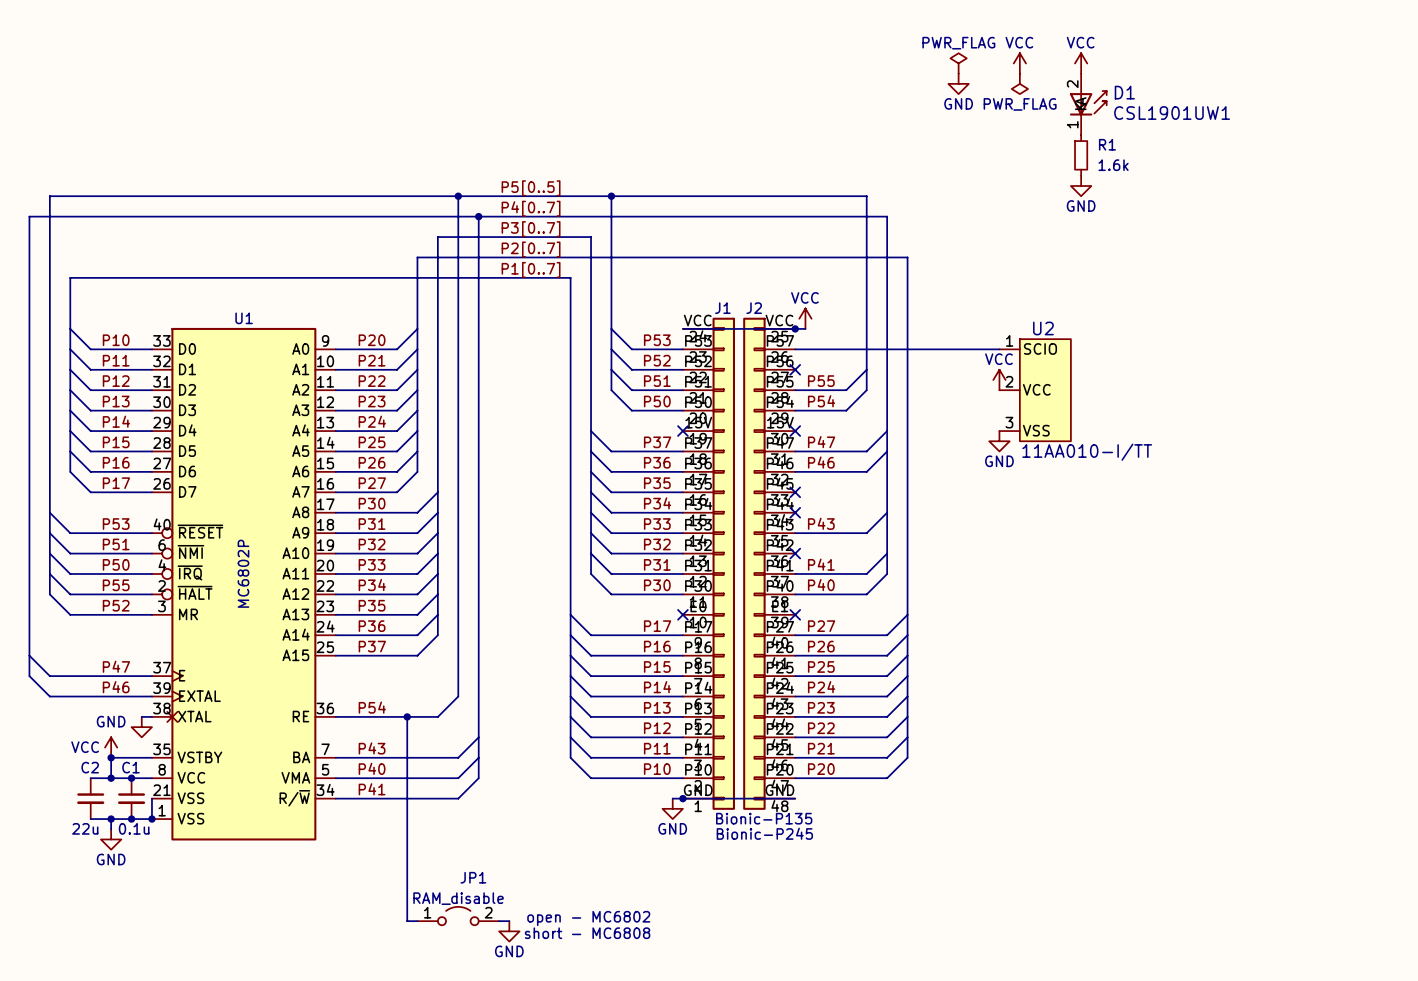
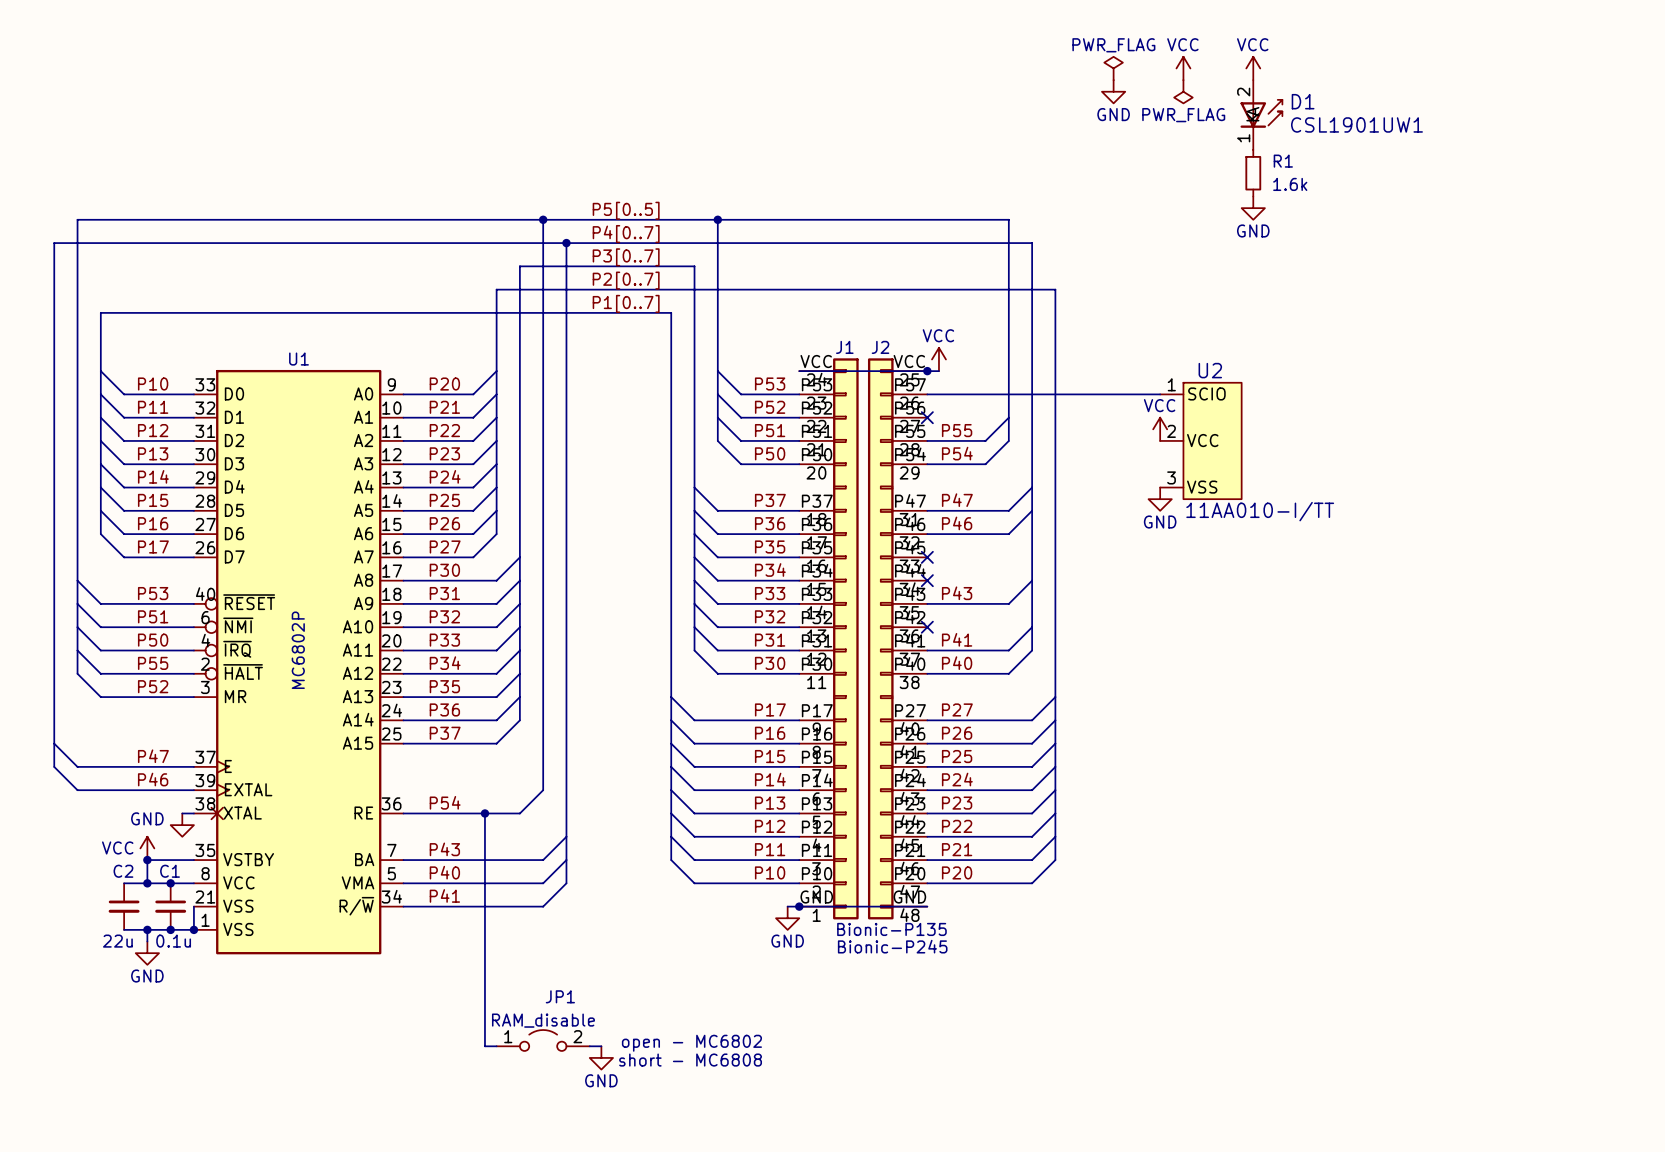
J1 symbol: [682, 317, 736, 810] -> [799, 358, 859, 920]
J2 symbol: [743, 317, 796, 810] -> [867, 358, 928, 920]
no-connect mark: (682, 431) -> none
no-connect mark: (795, 431) -> none
no-connect mark: (682, 614) -> none
no-connect mark: (795, 614) -> none

